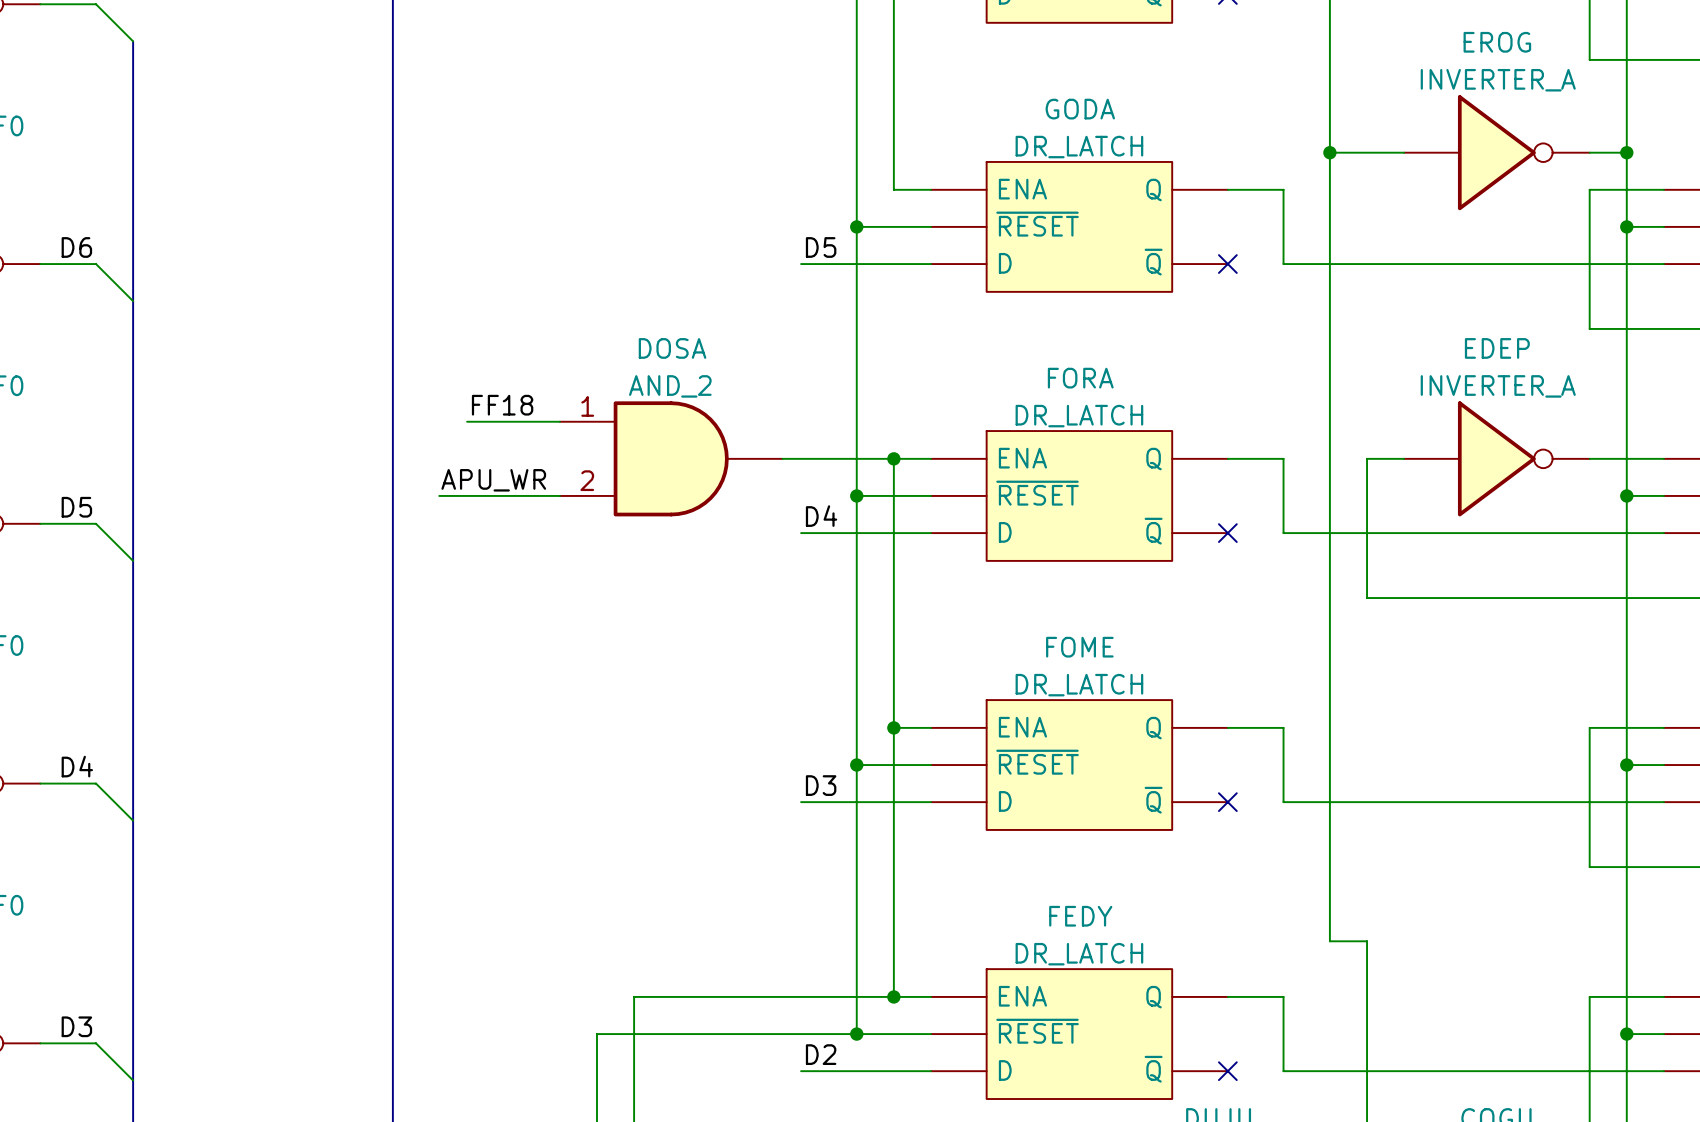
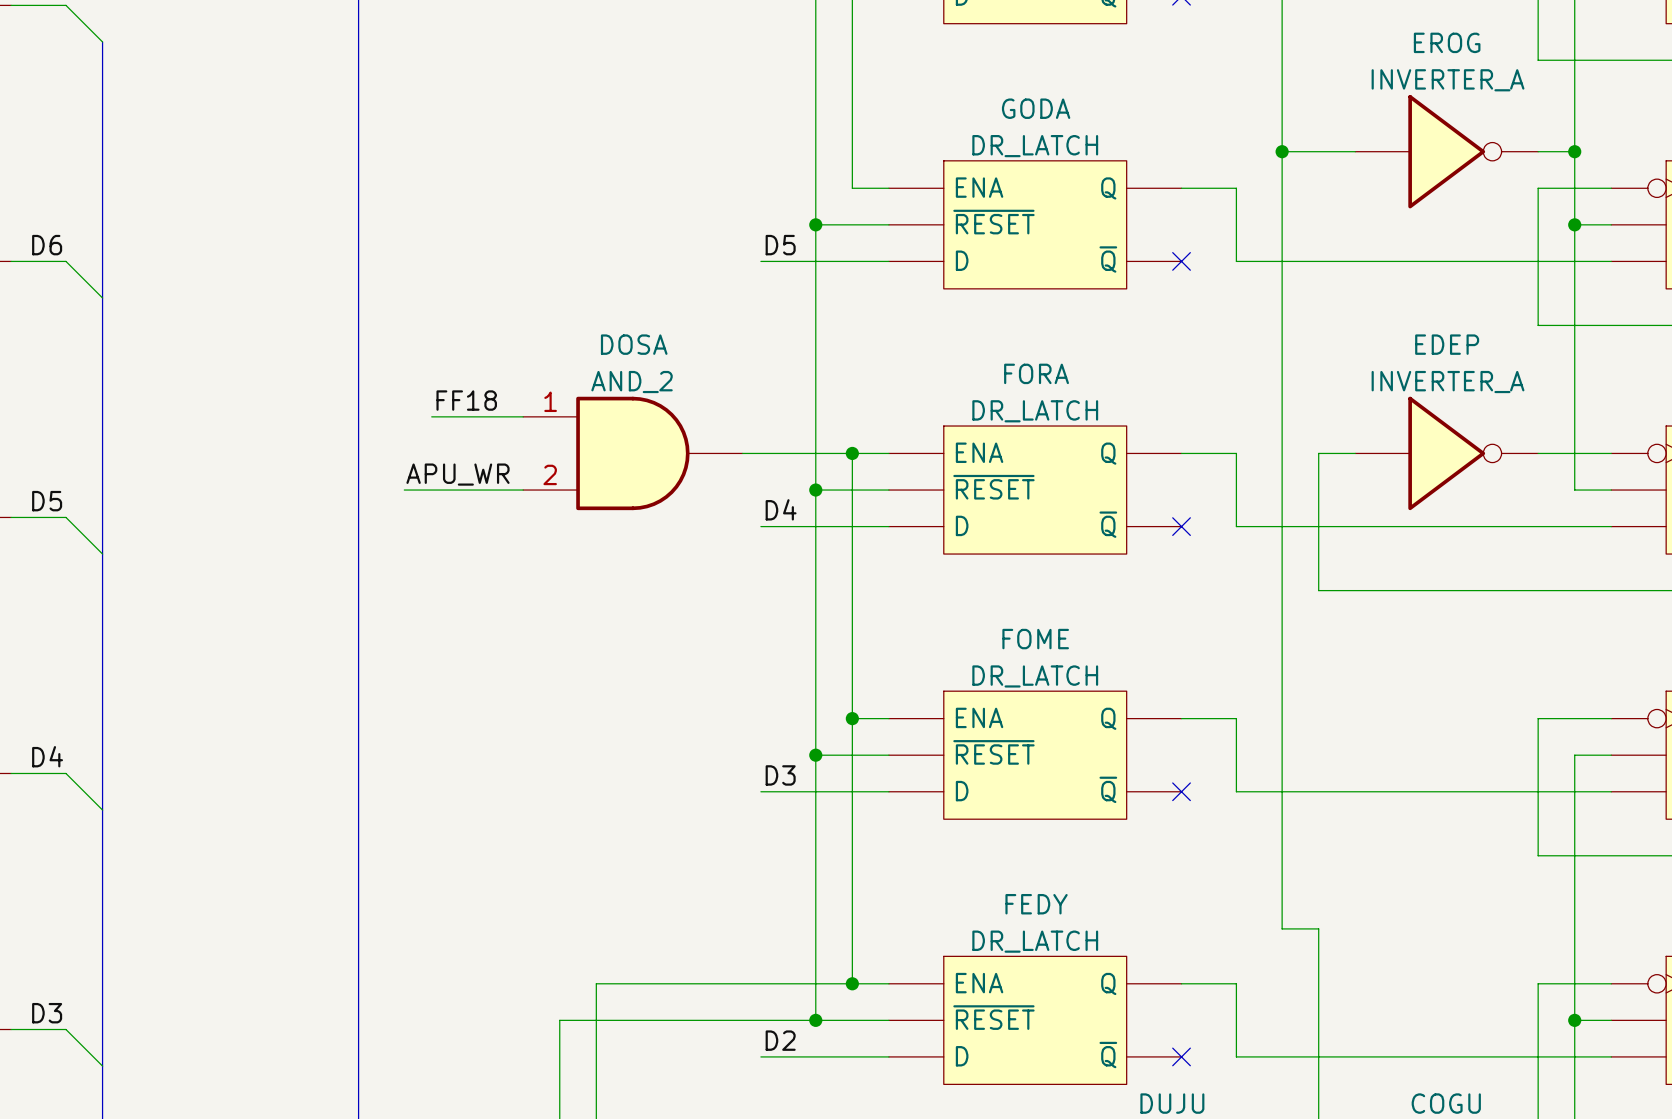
wire: (1626, 495) (1626, 765) -> none
junction: (1626, 495) -> none
junction: (1626, 765) -> none

